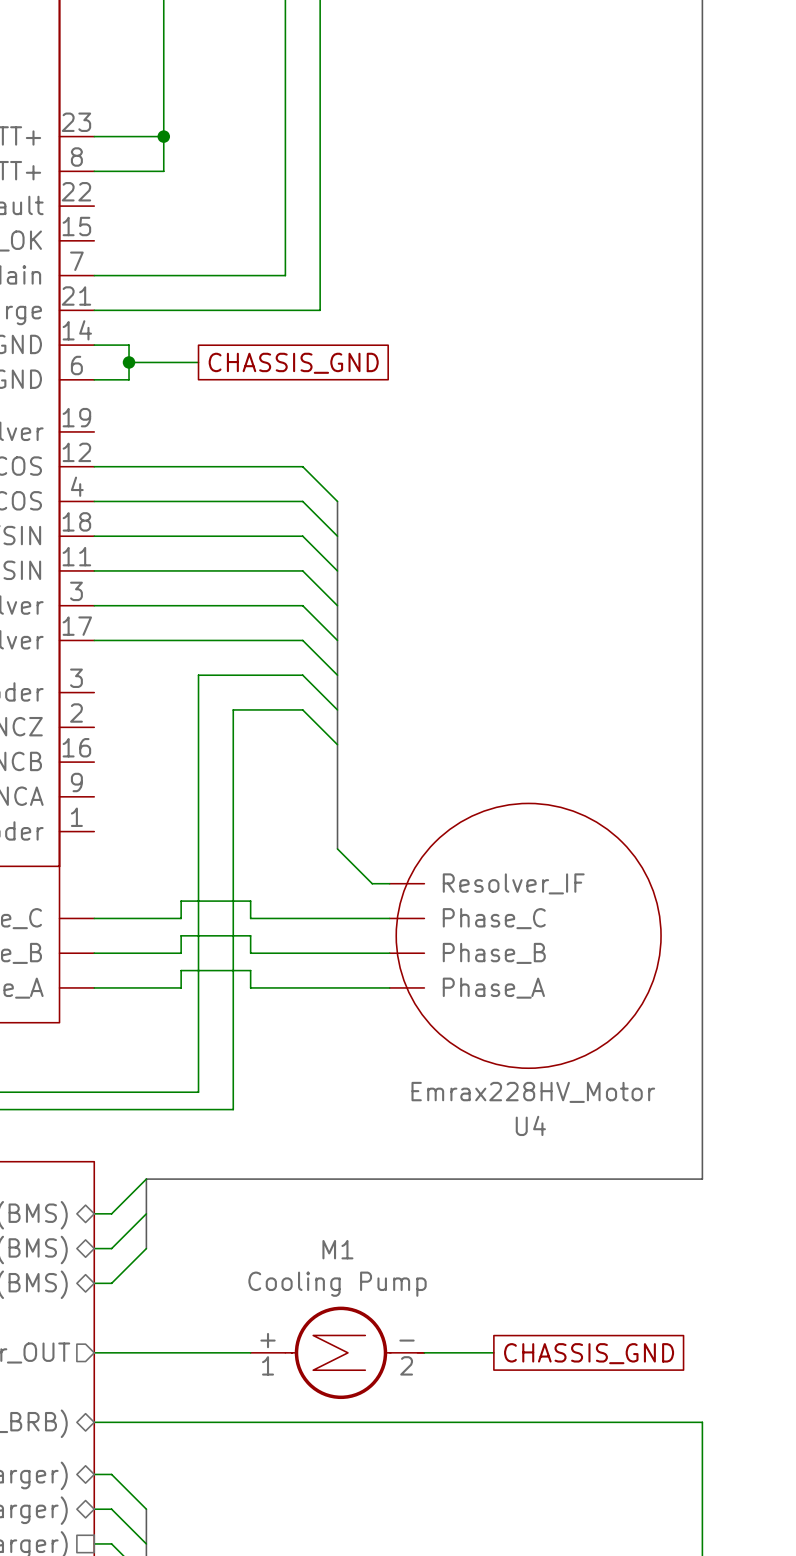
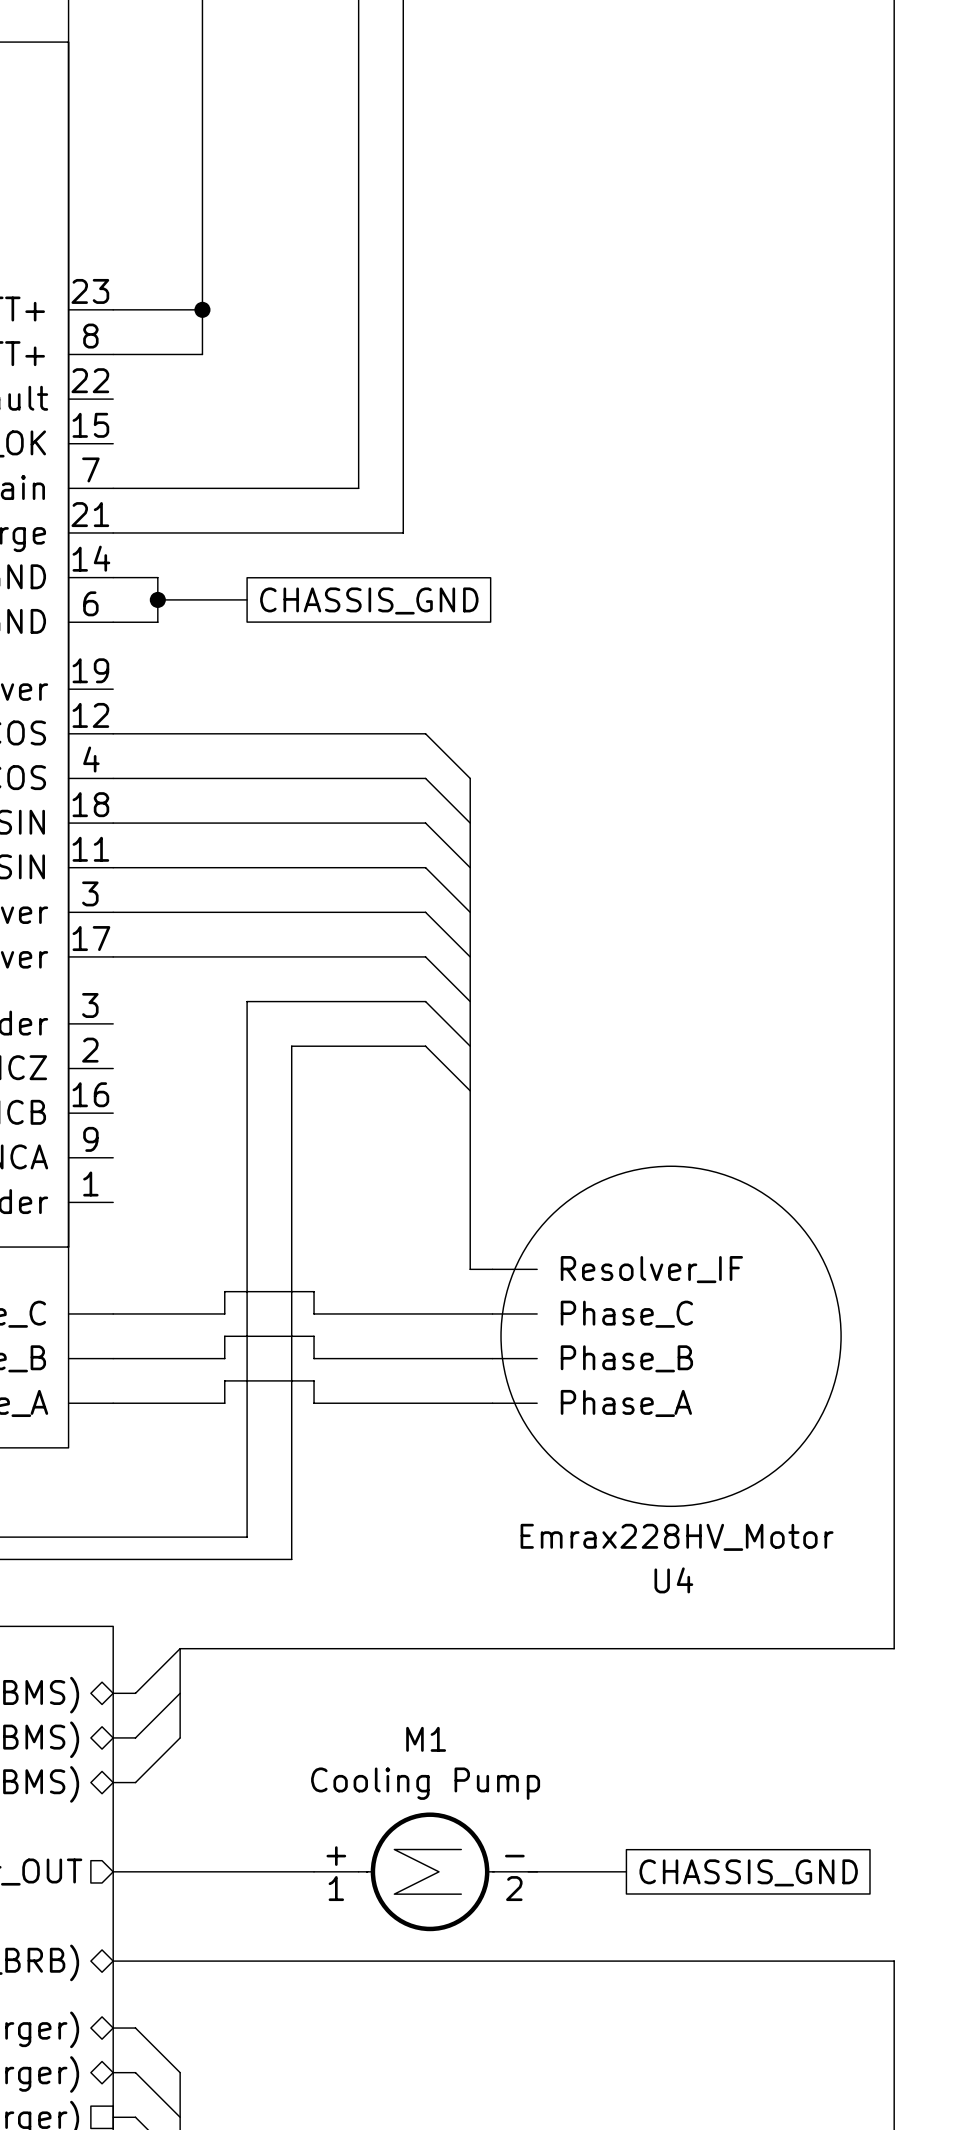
wire: (302, 466) (337, 501) -> (380, 733) (425, 733) (470, 778)
wire: (302, 501) (337, 536) -> (380, 778) (425, 778) (470, 823)
bus: (337, 501) (337, 848) -> none
bus: none -> (470, 778) (470, 1269) (492, 1269)
wire: (302, 536) (337, 570) -> (380, 823) (425, 823) (470, 867)
wire: (302, 570) (337, 605) -> (380, 867) (425, 867) (470, 912)
wire: (302, 605) (337, 640) -> (380, 912) (425, 912) (470, 956)
wire: (302, 640) (337, 675) -> (380, 956) (425, 956) (470, 1001)
wire: (302, 675) (337, 709) -> (380, 1001) (425, 1001) (470, 1046)
wire: (302, 709) (337, 744) -> (380, 1046) (425, 1046) (470, 1090)
wire: (337, 848) (372, 883) (389, 883) -> none

